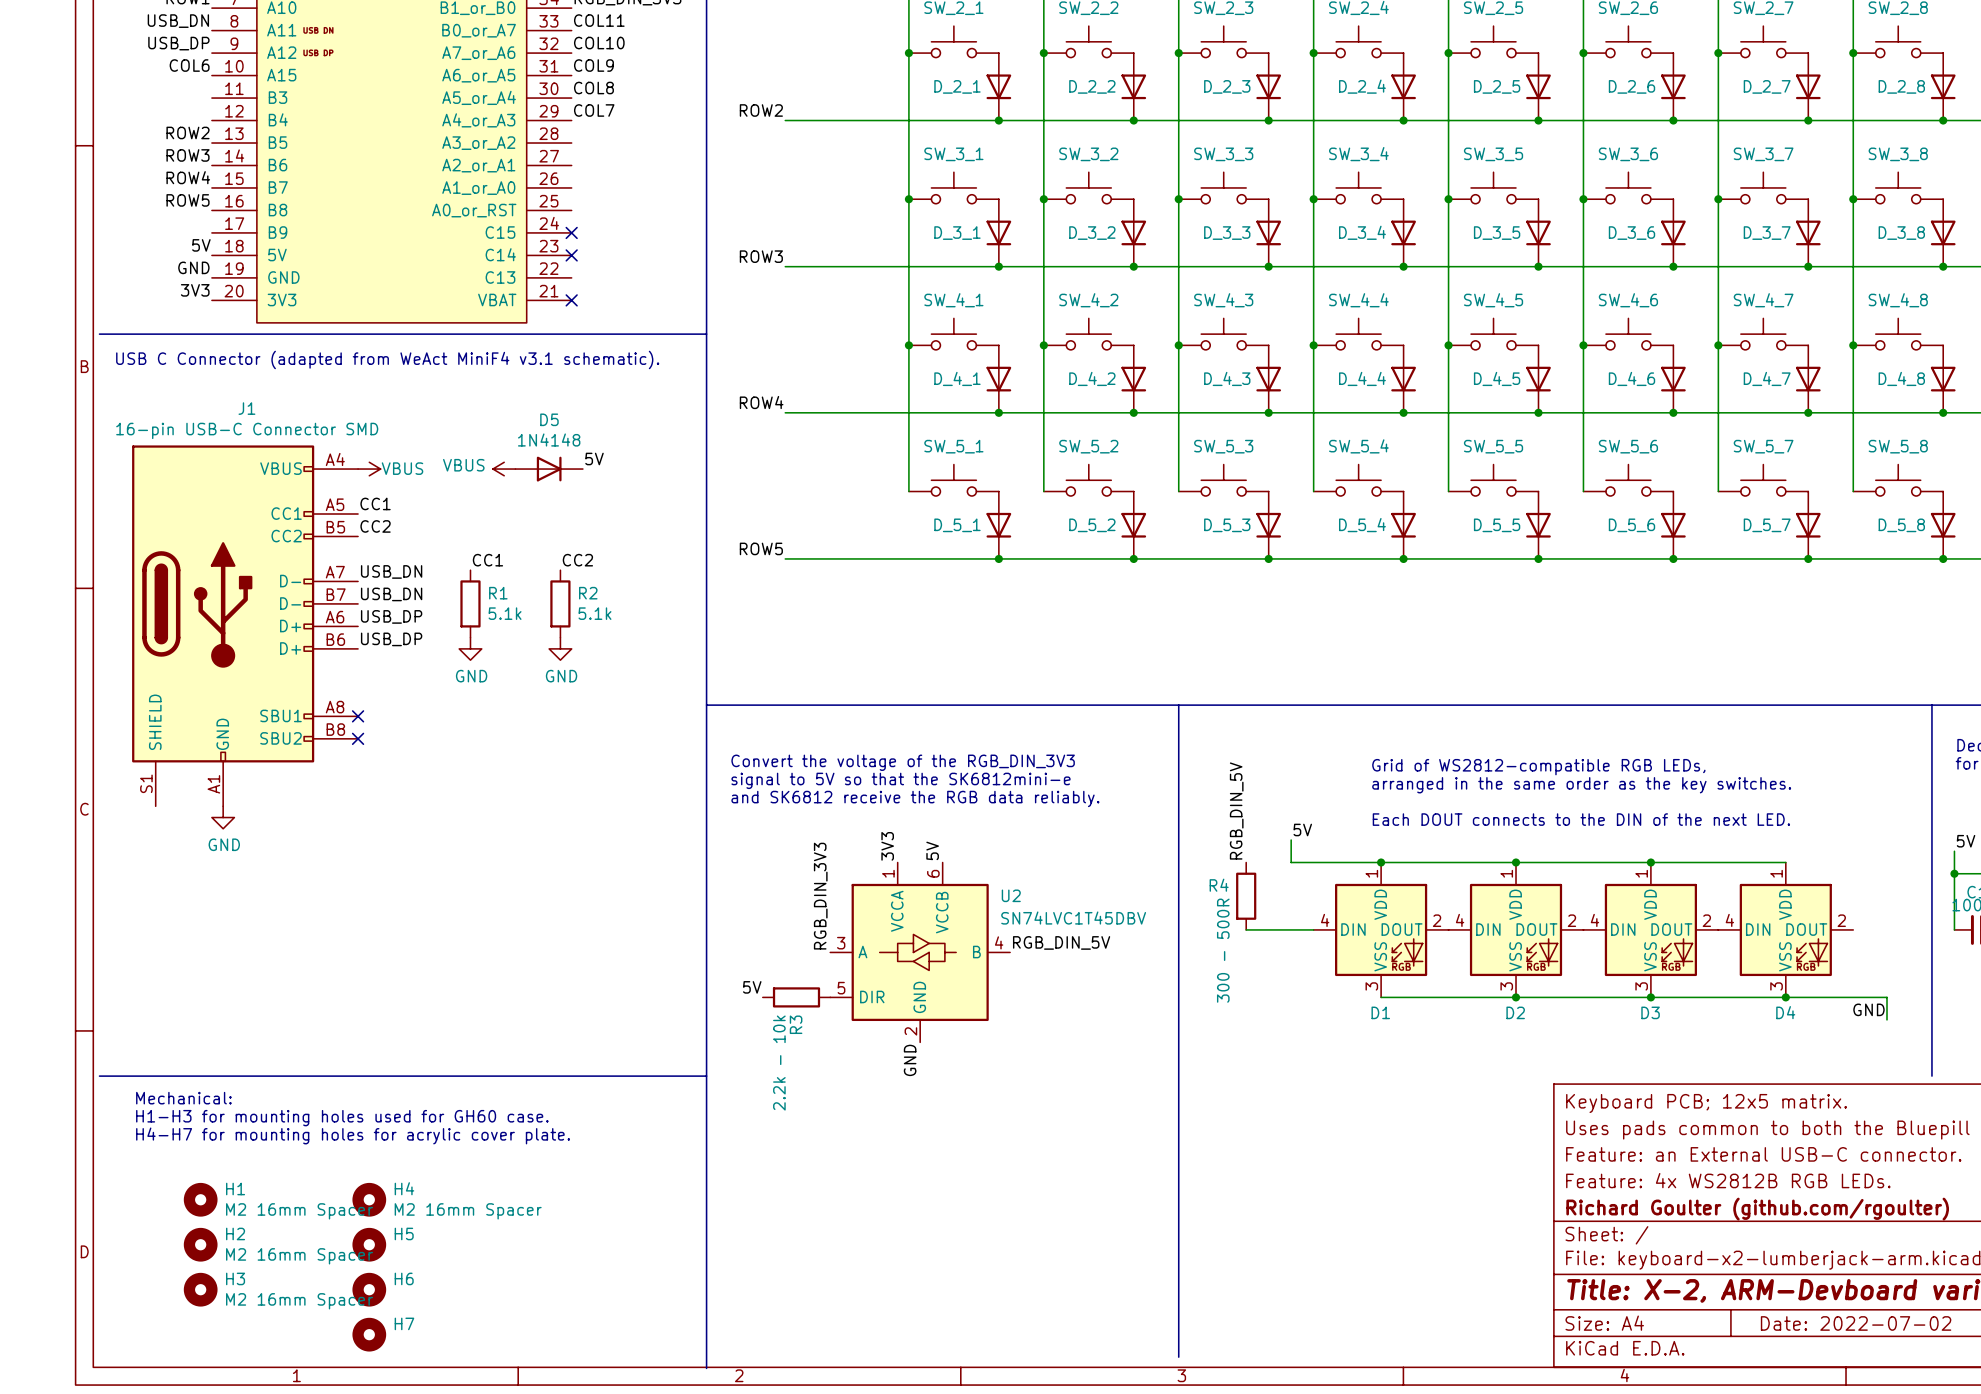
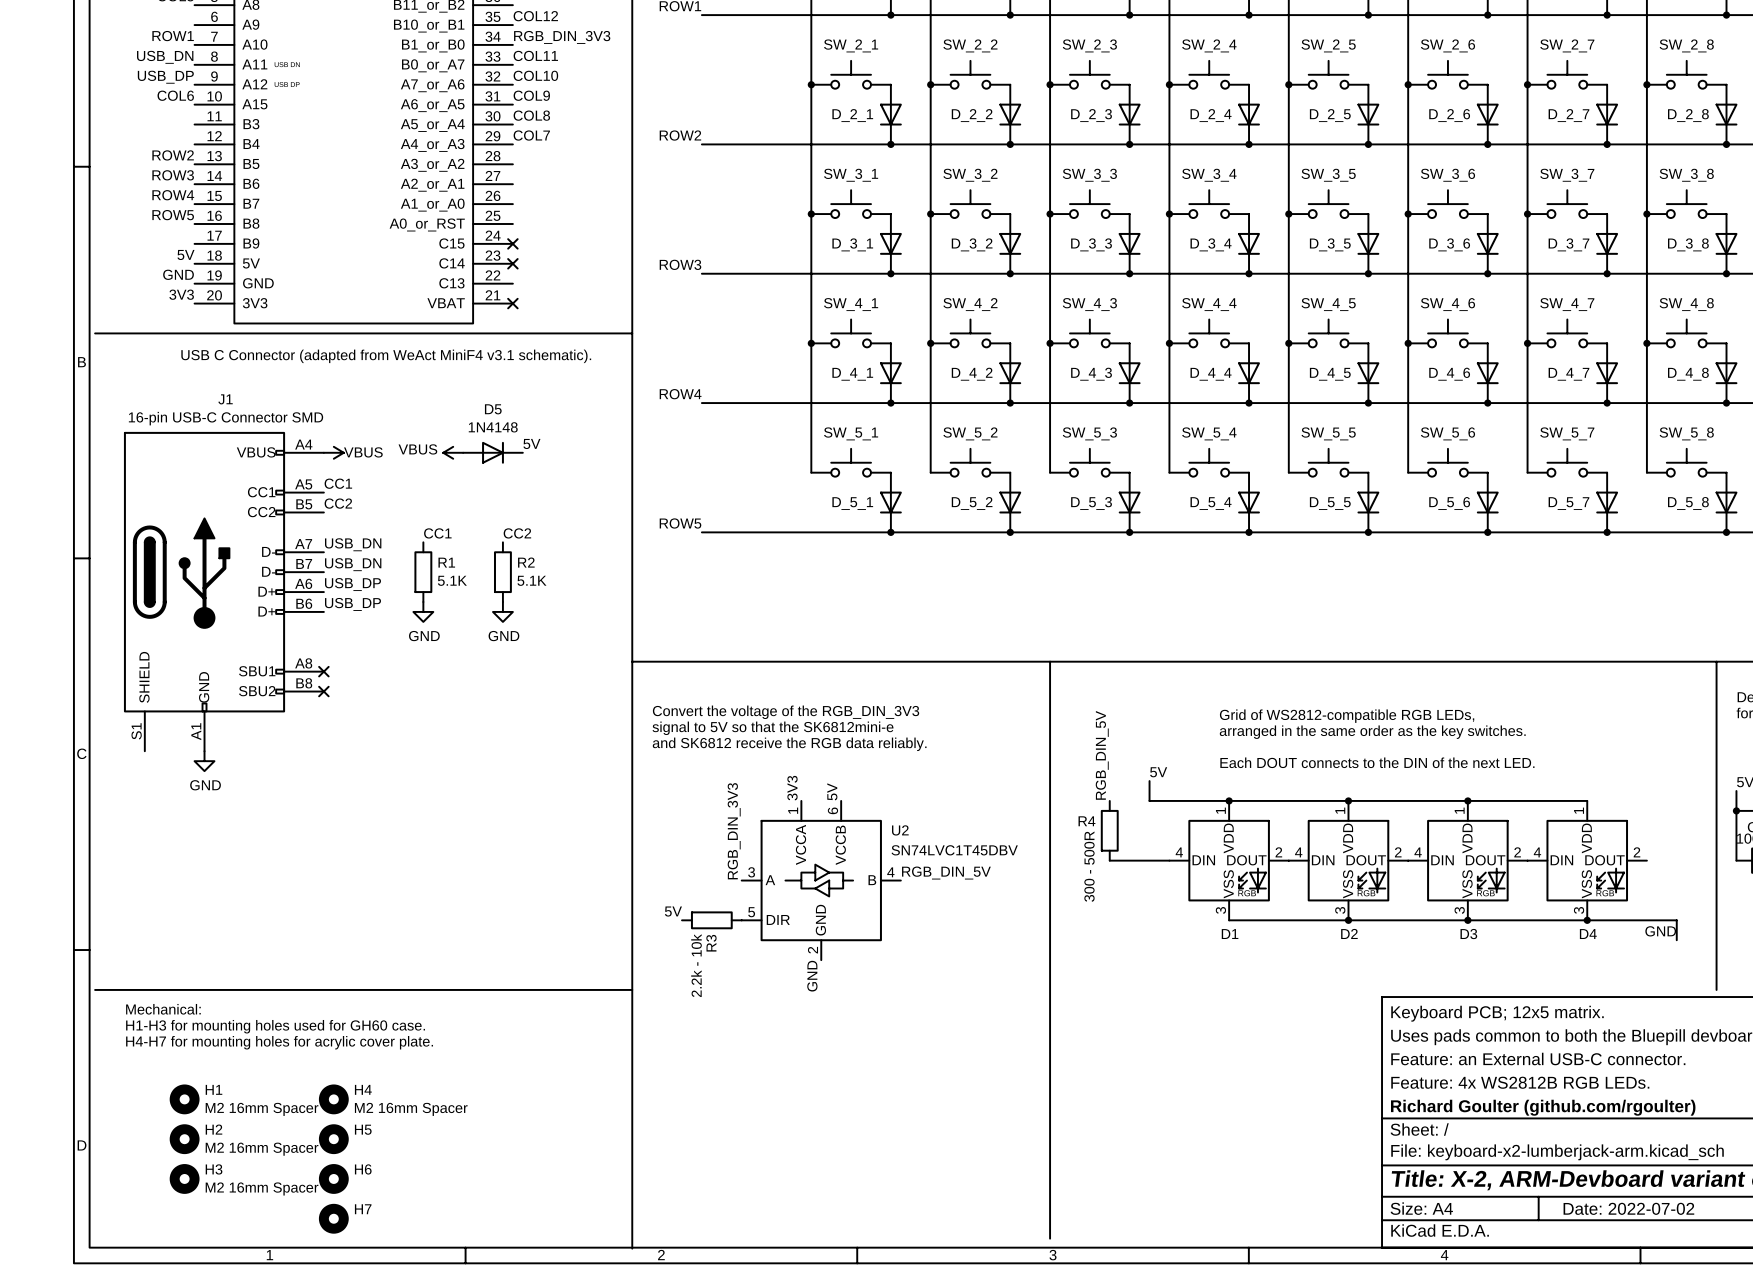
R1 value: 5.1k (505, 613) -> 5.1K (452, 580)
R2 value: 5.1k (594, 613) -> 5.1K (531, 580)

